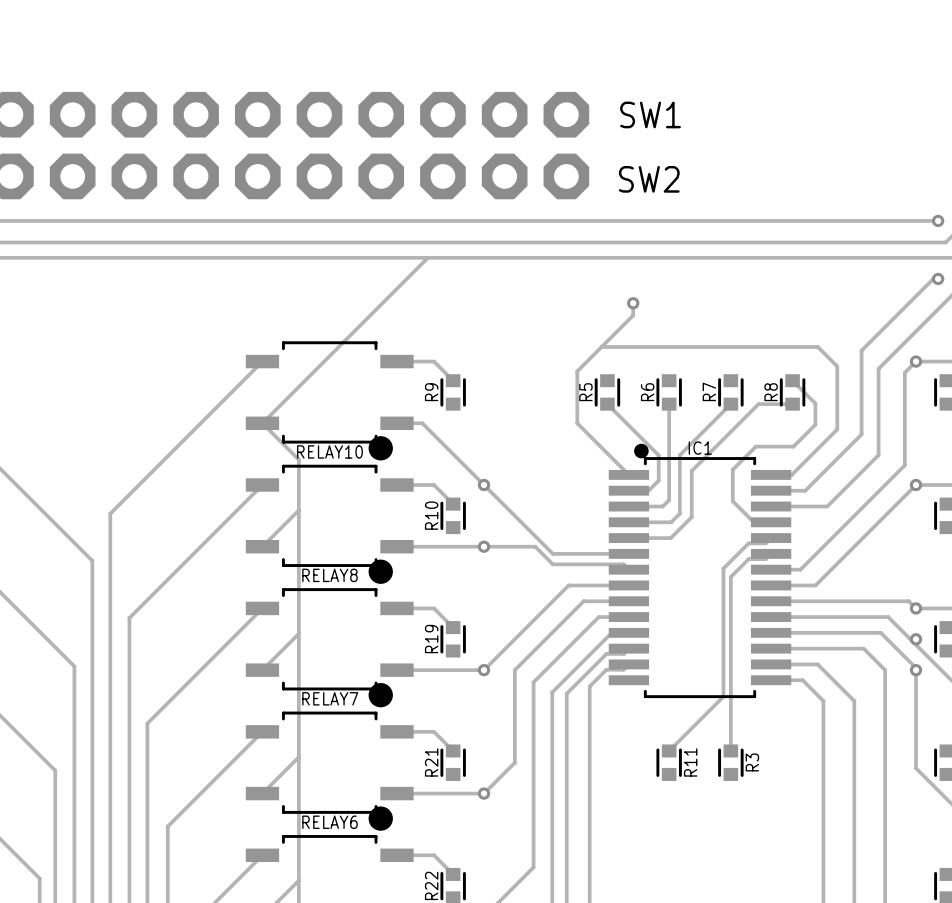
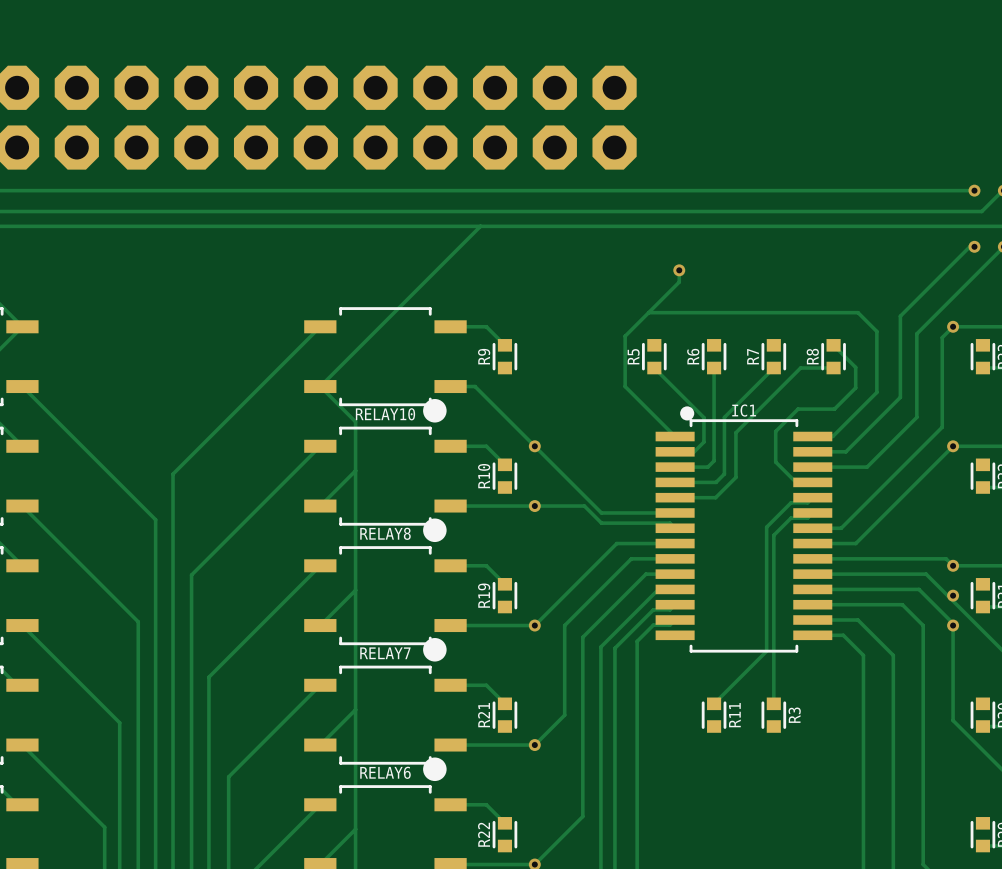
text: SW1 (650, 114) -> none
text: SW2 (649, 179) -> none

